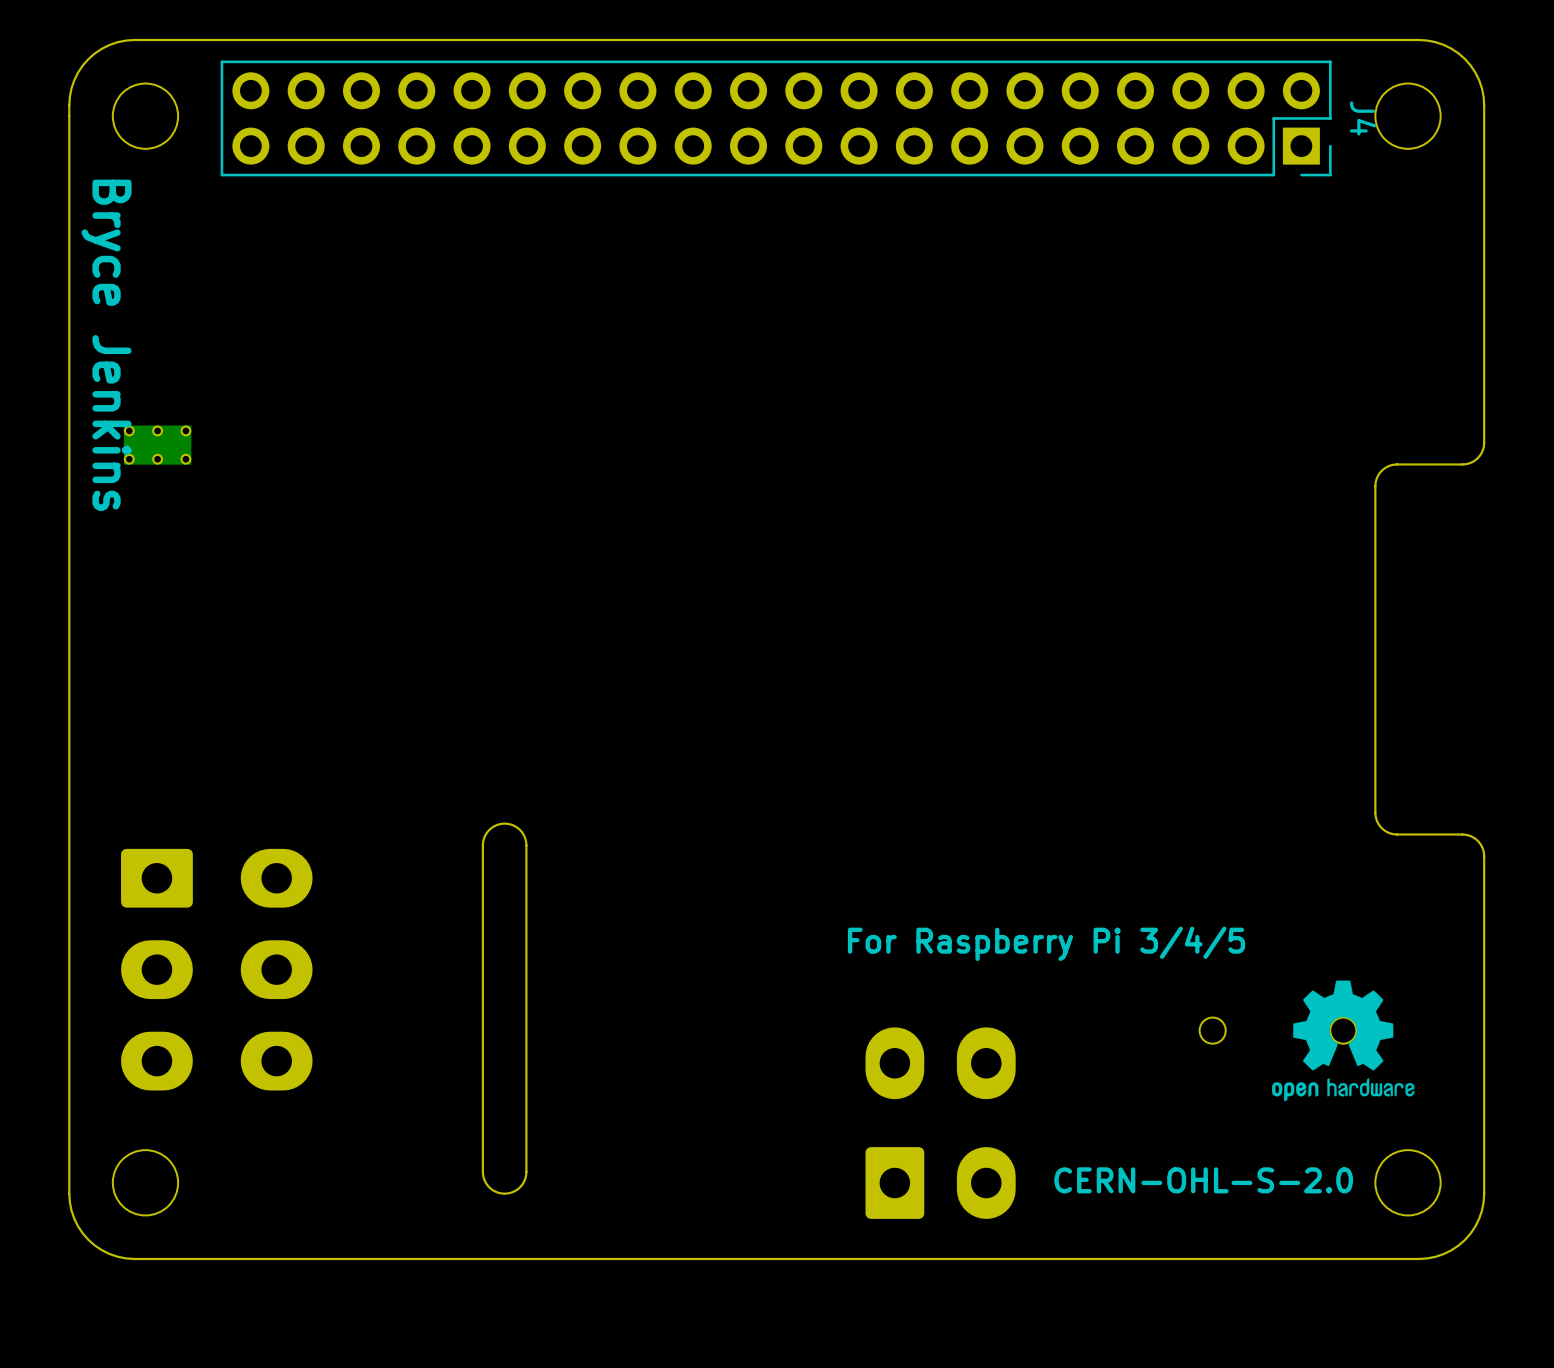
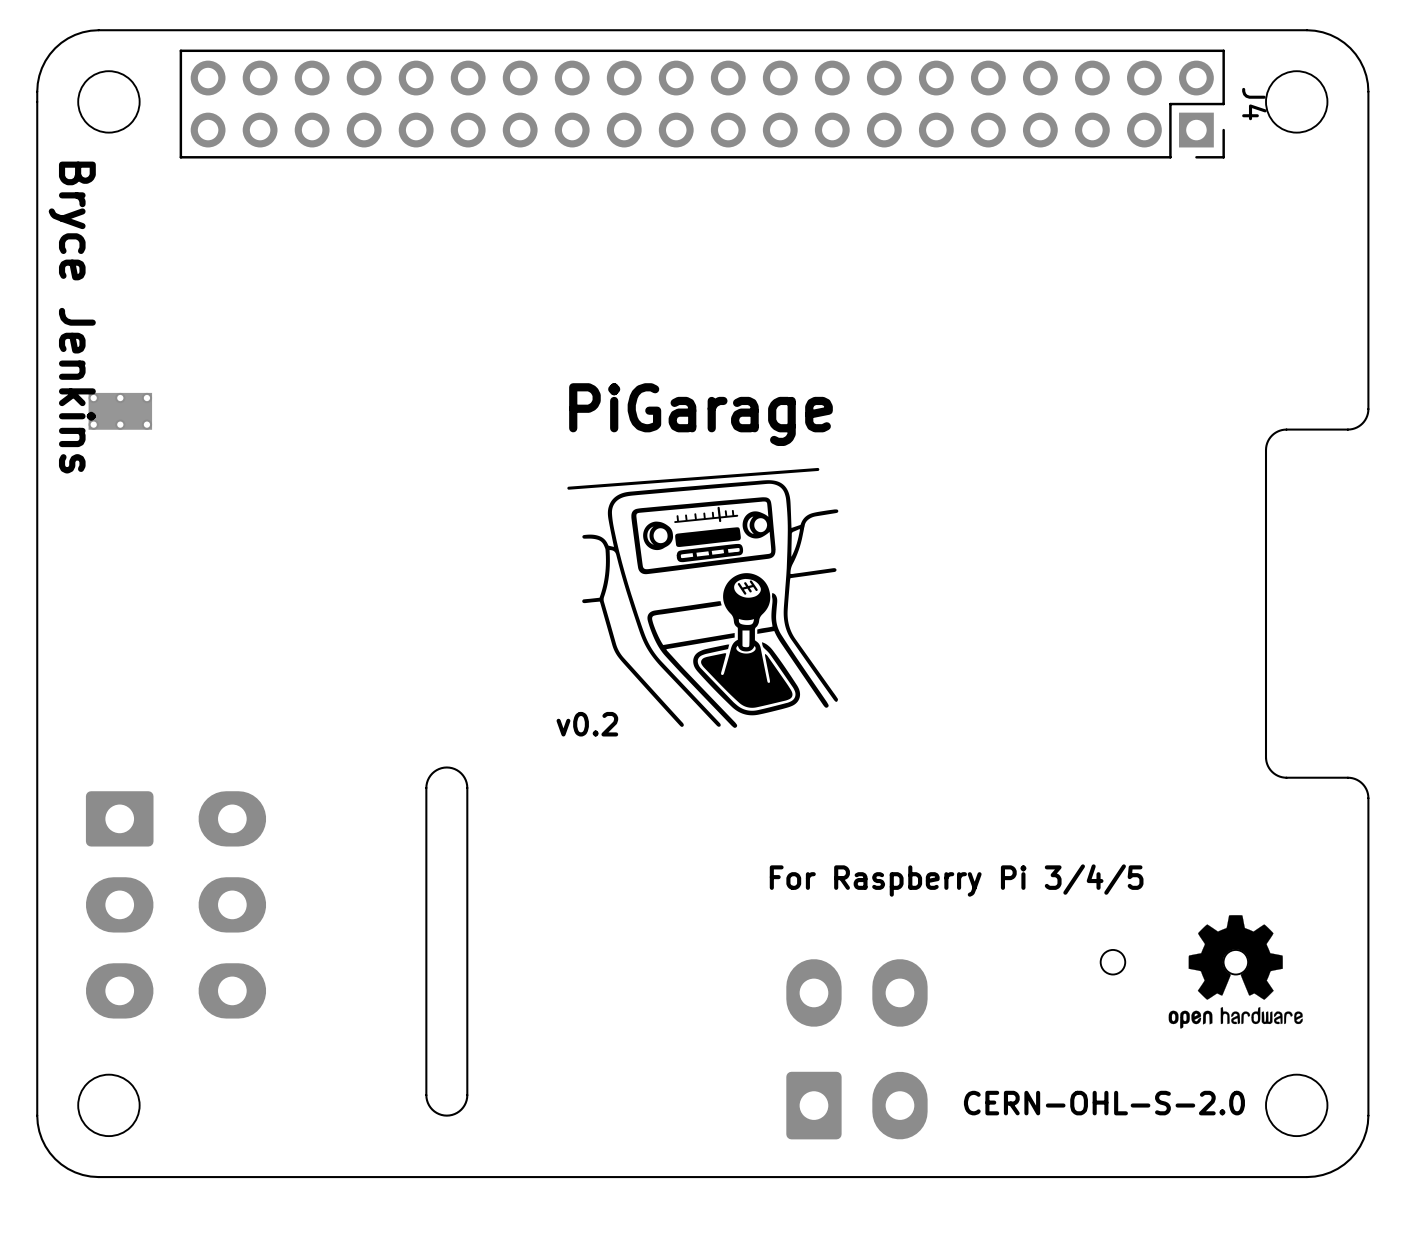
text: none -> PiGarage (700, 414)
drawing: none -> [567, 467, 839, 728]
text: none -> v0.2 (587, 724)

